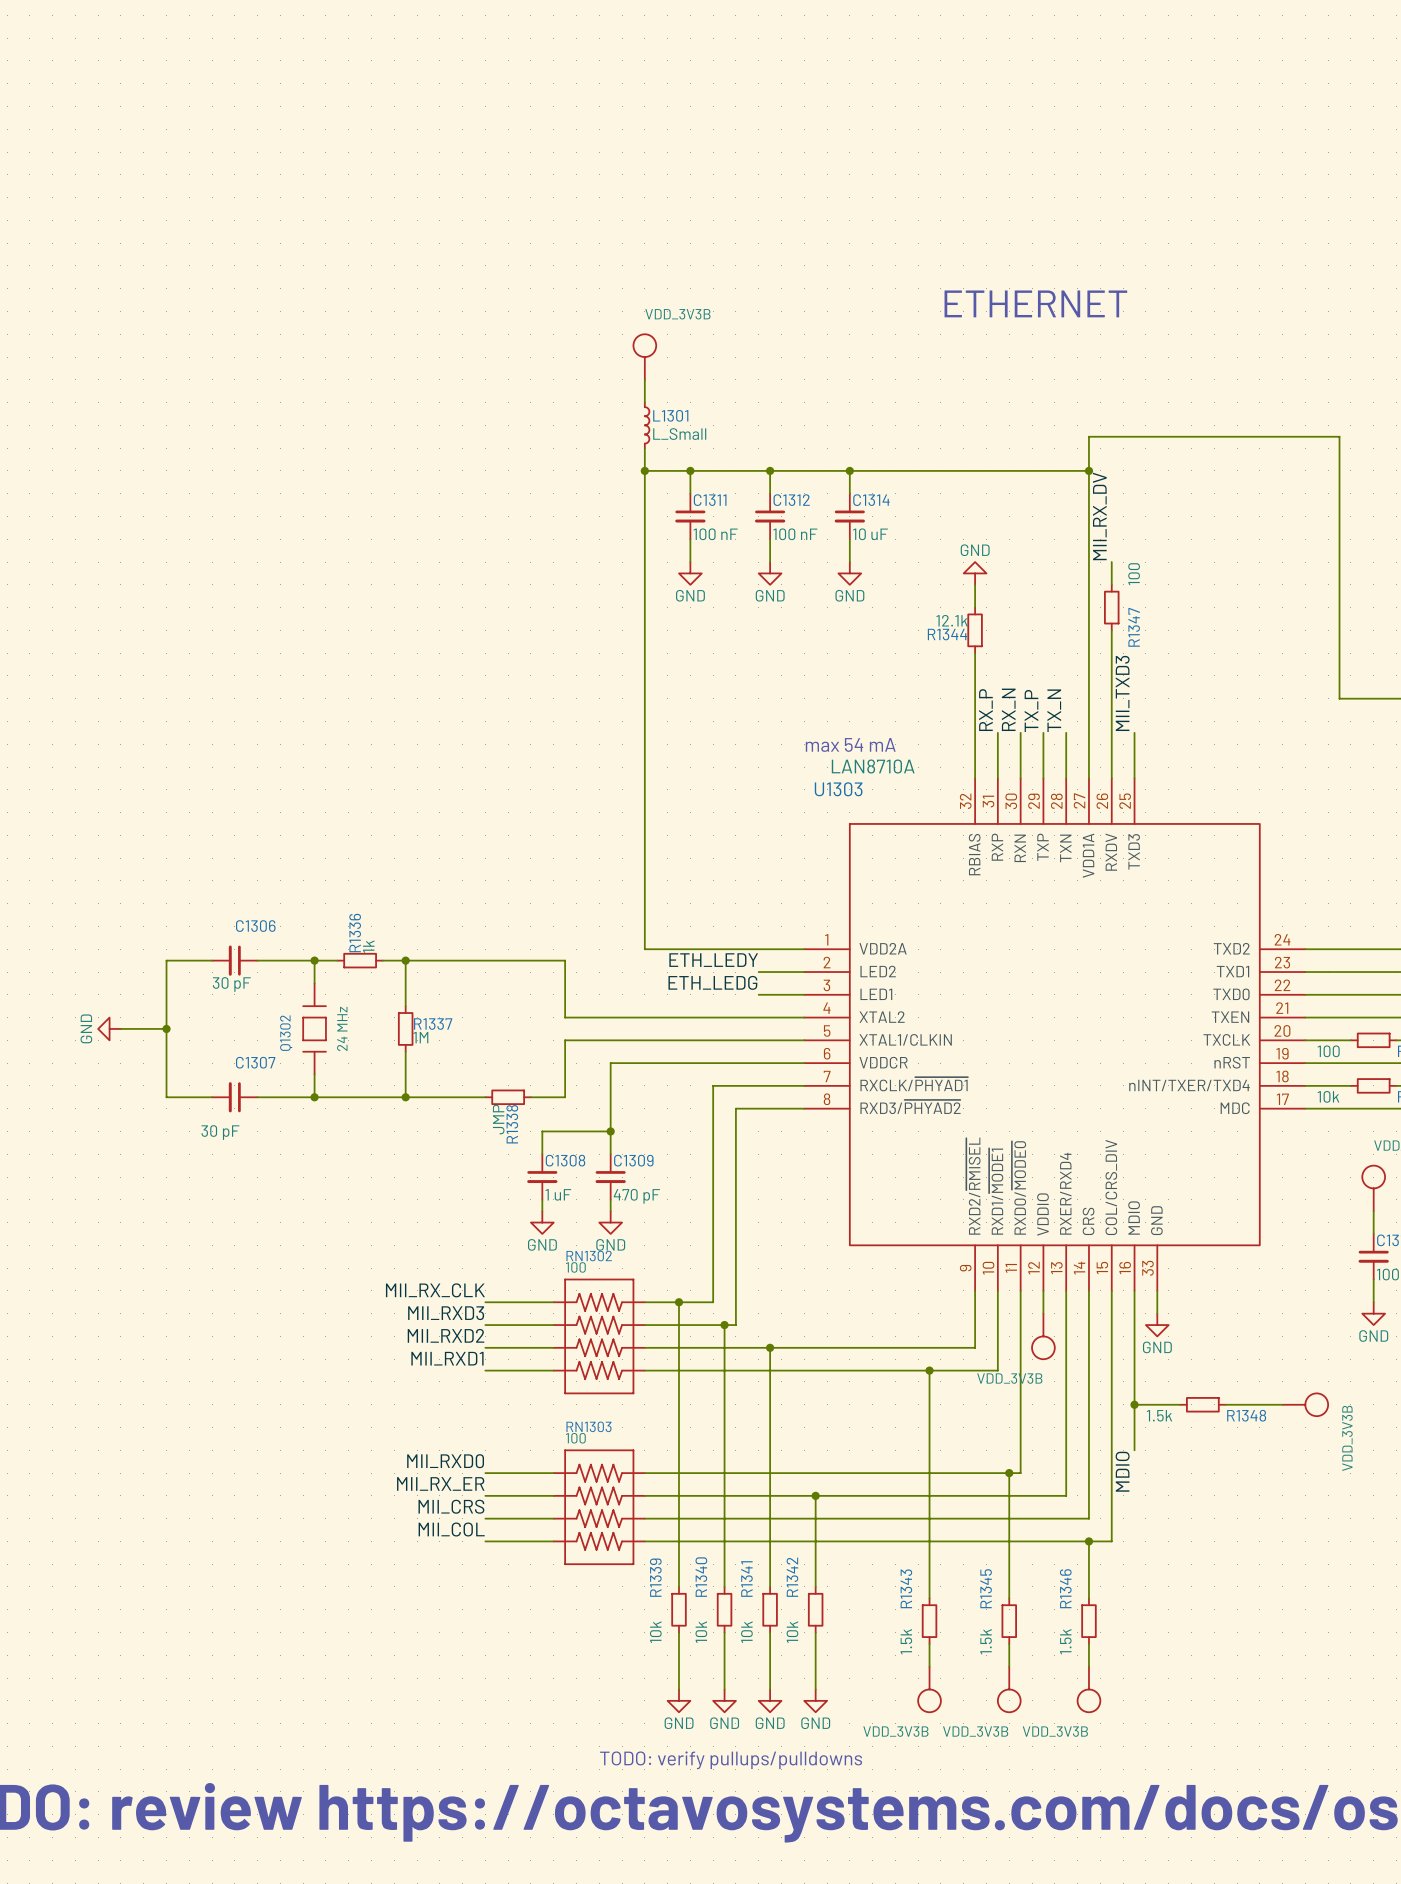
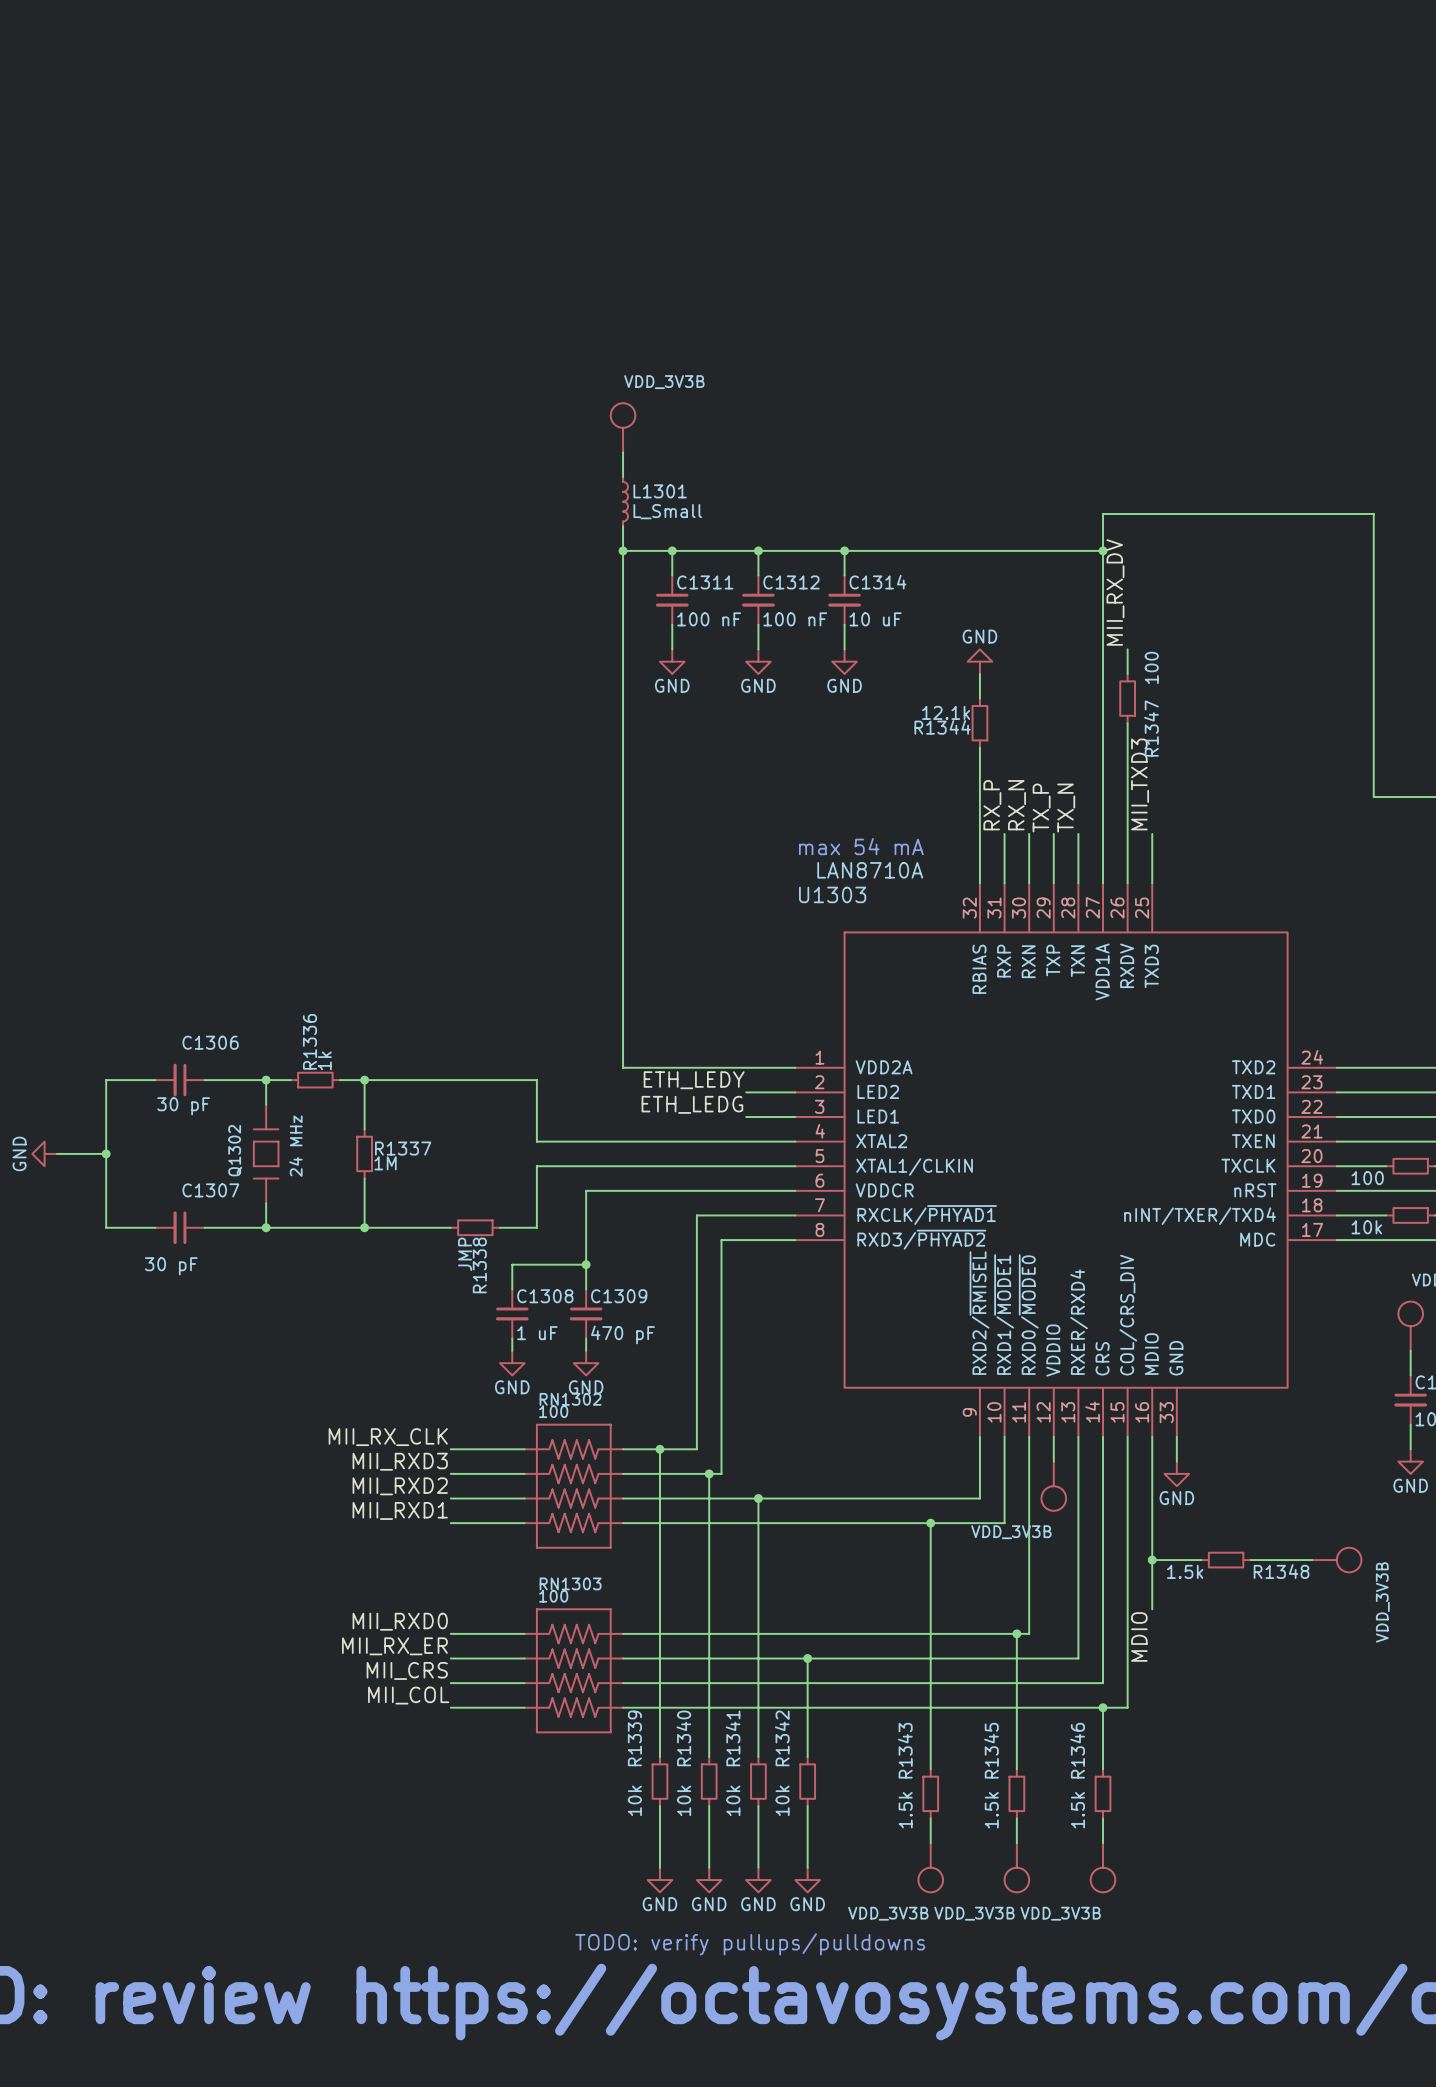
text: ETHERNET (1035, 303) -> none

